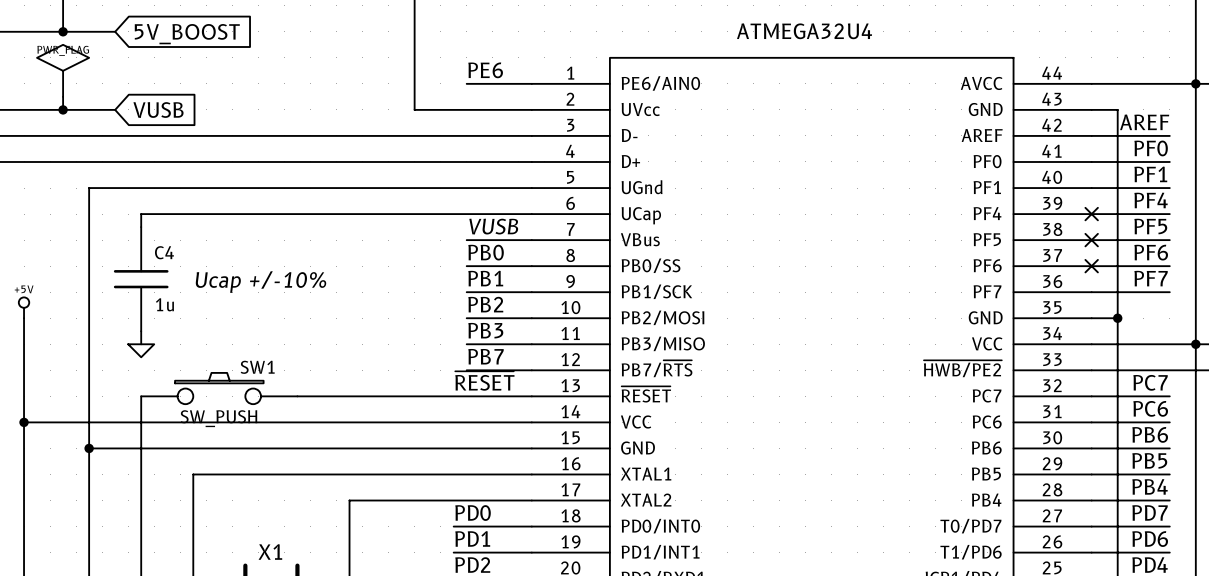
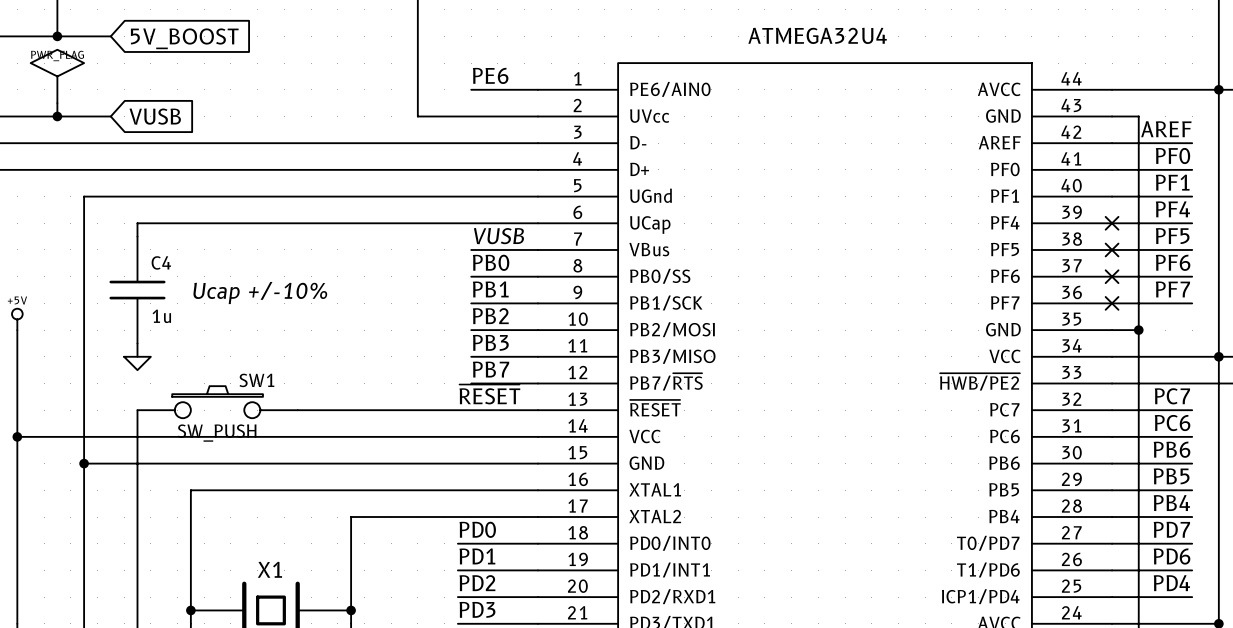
no-connect mark: none -> (1112, 303)

